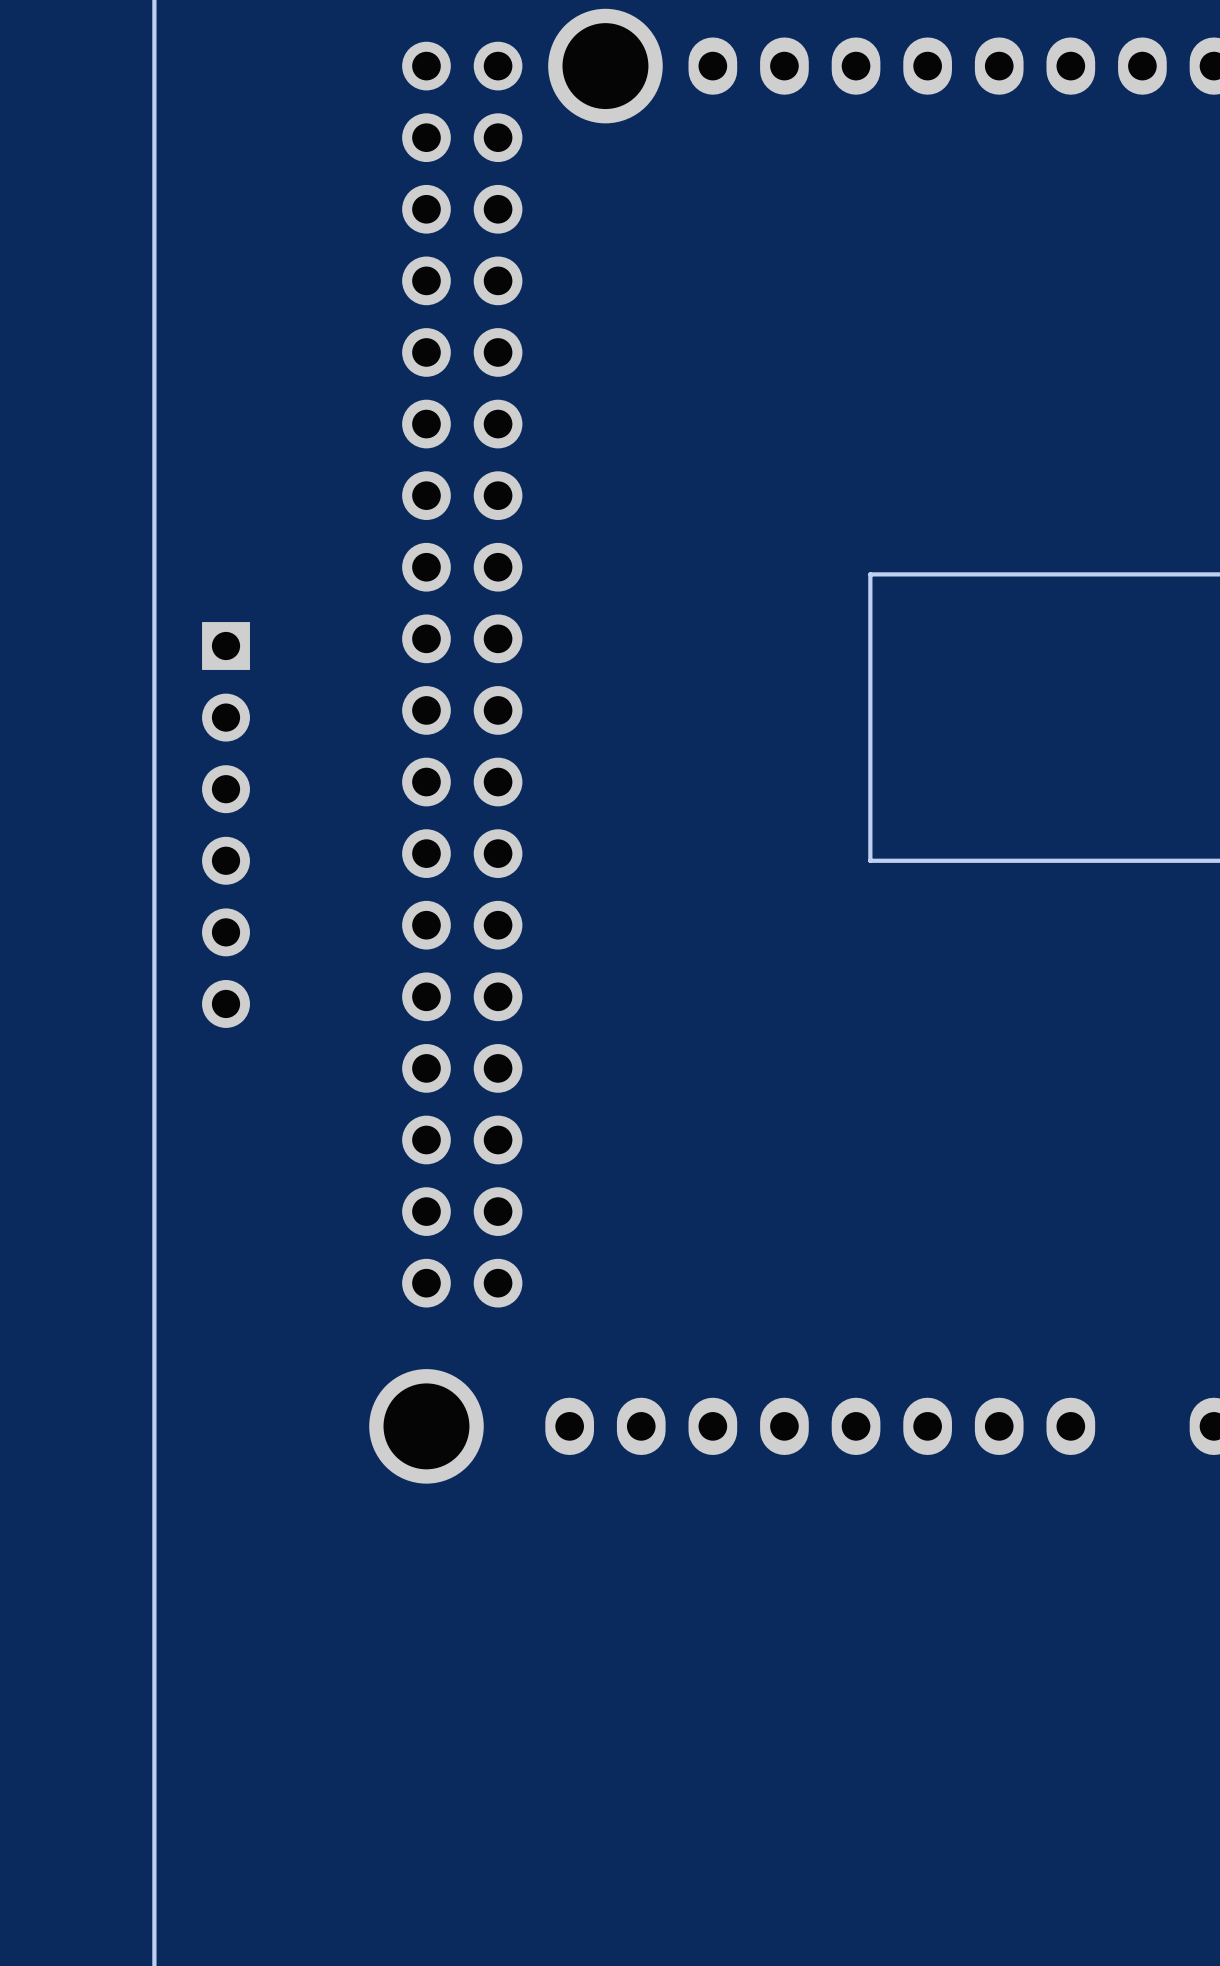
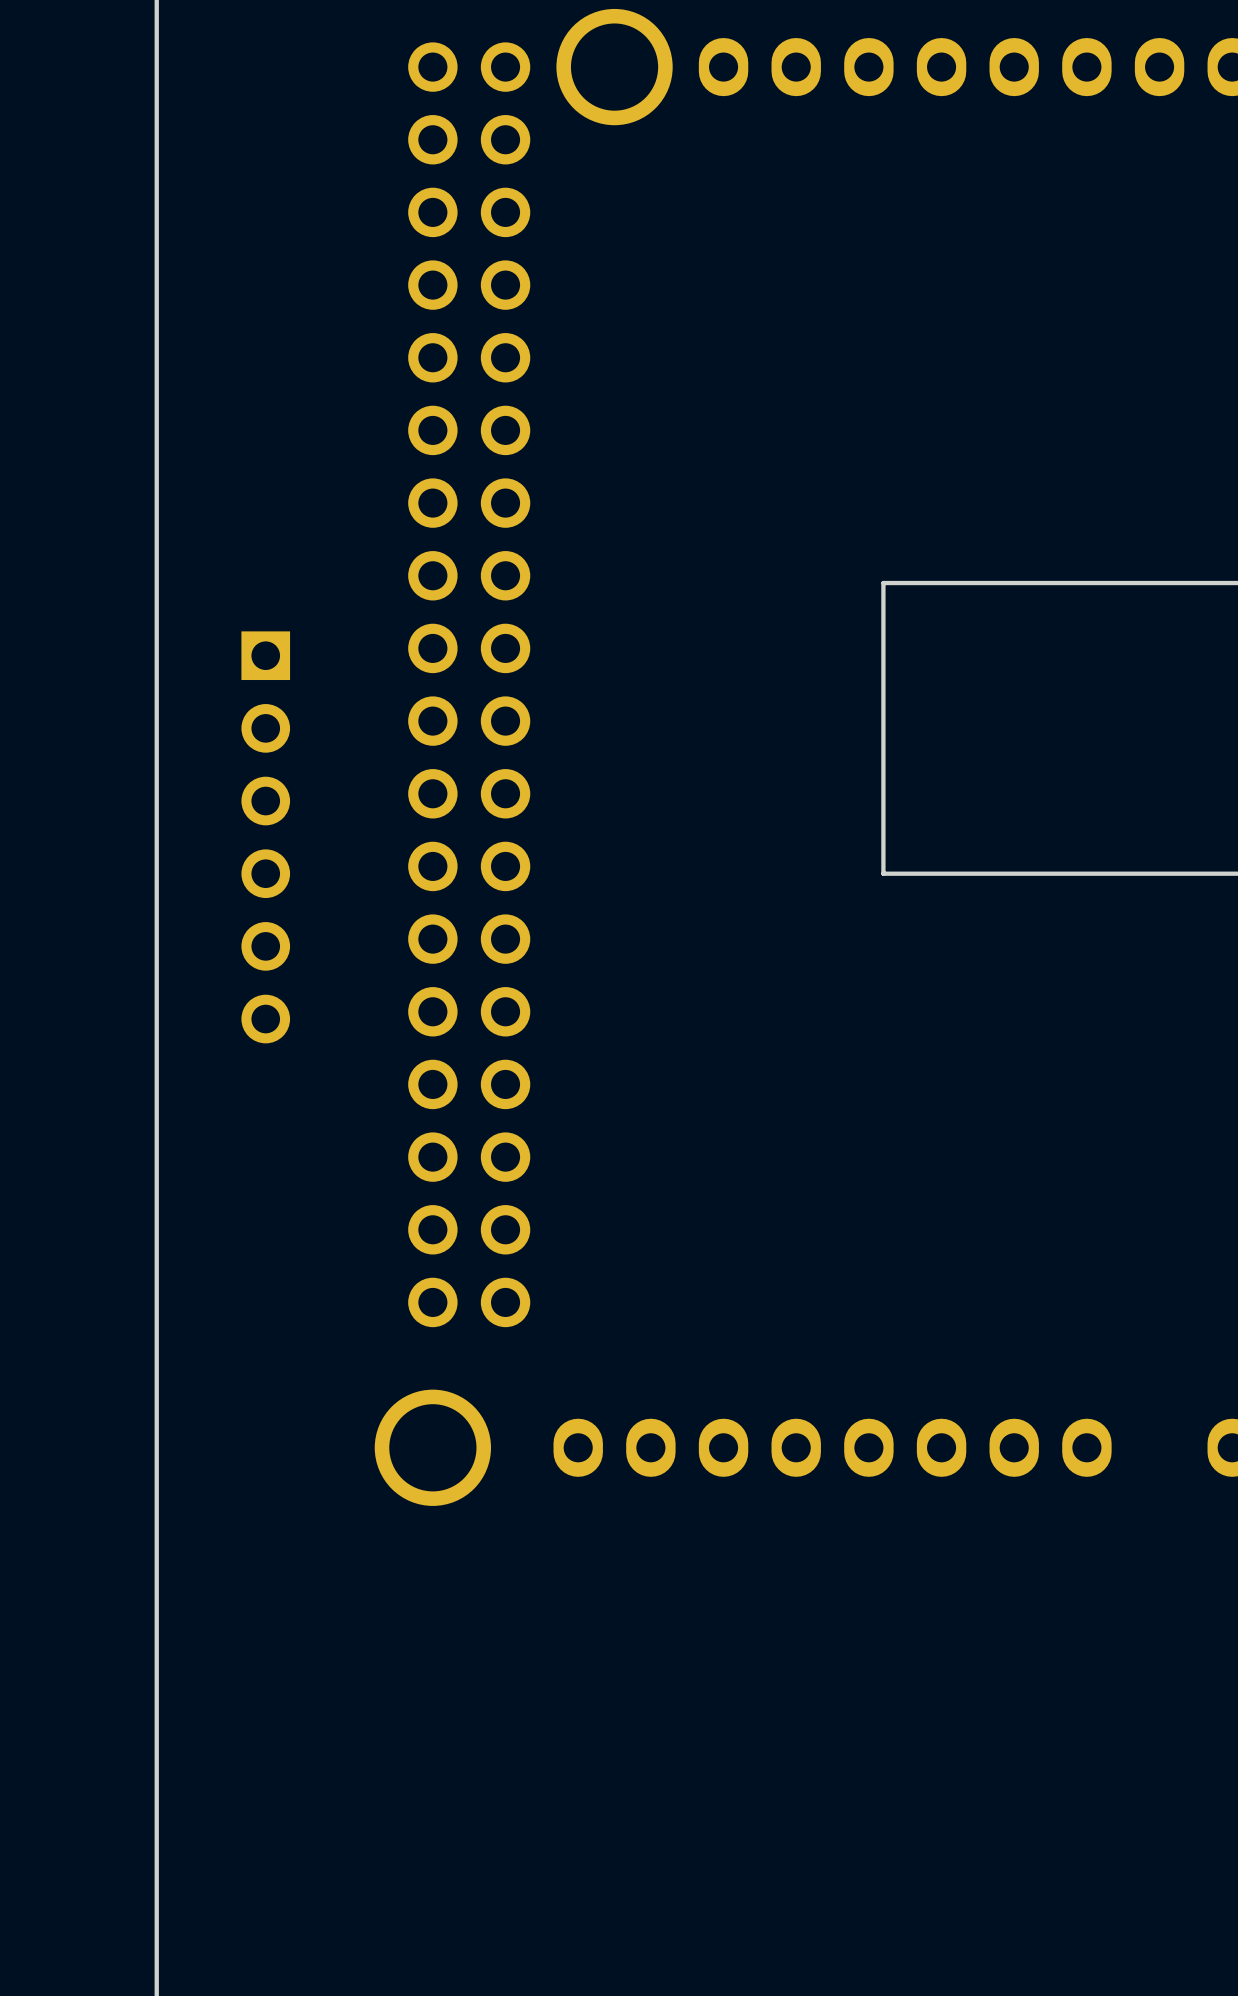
part position: (226, 824) -> (265, 837)

